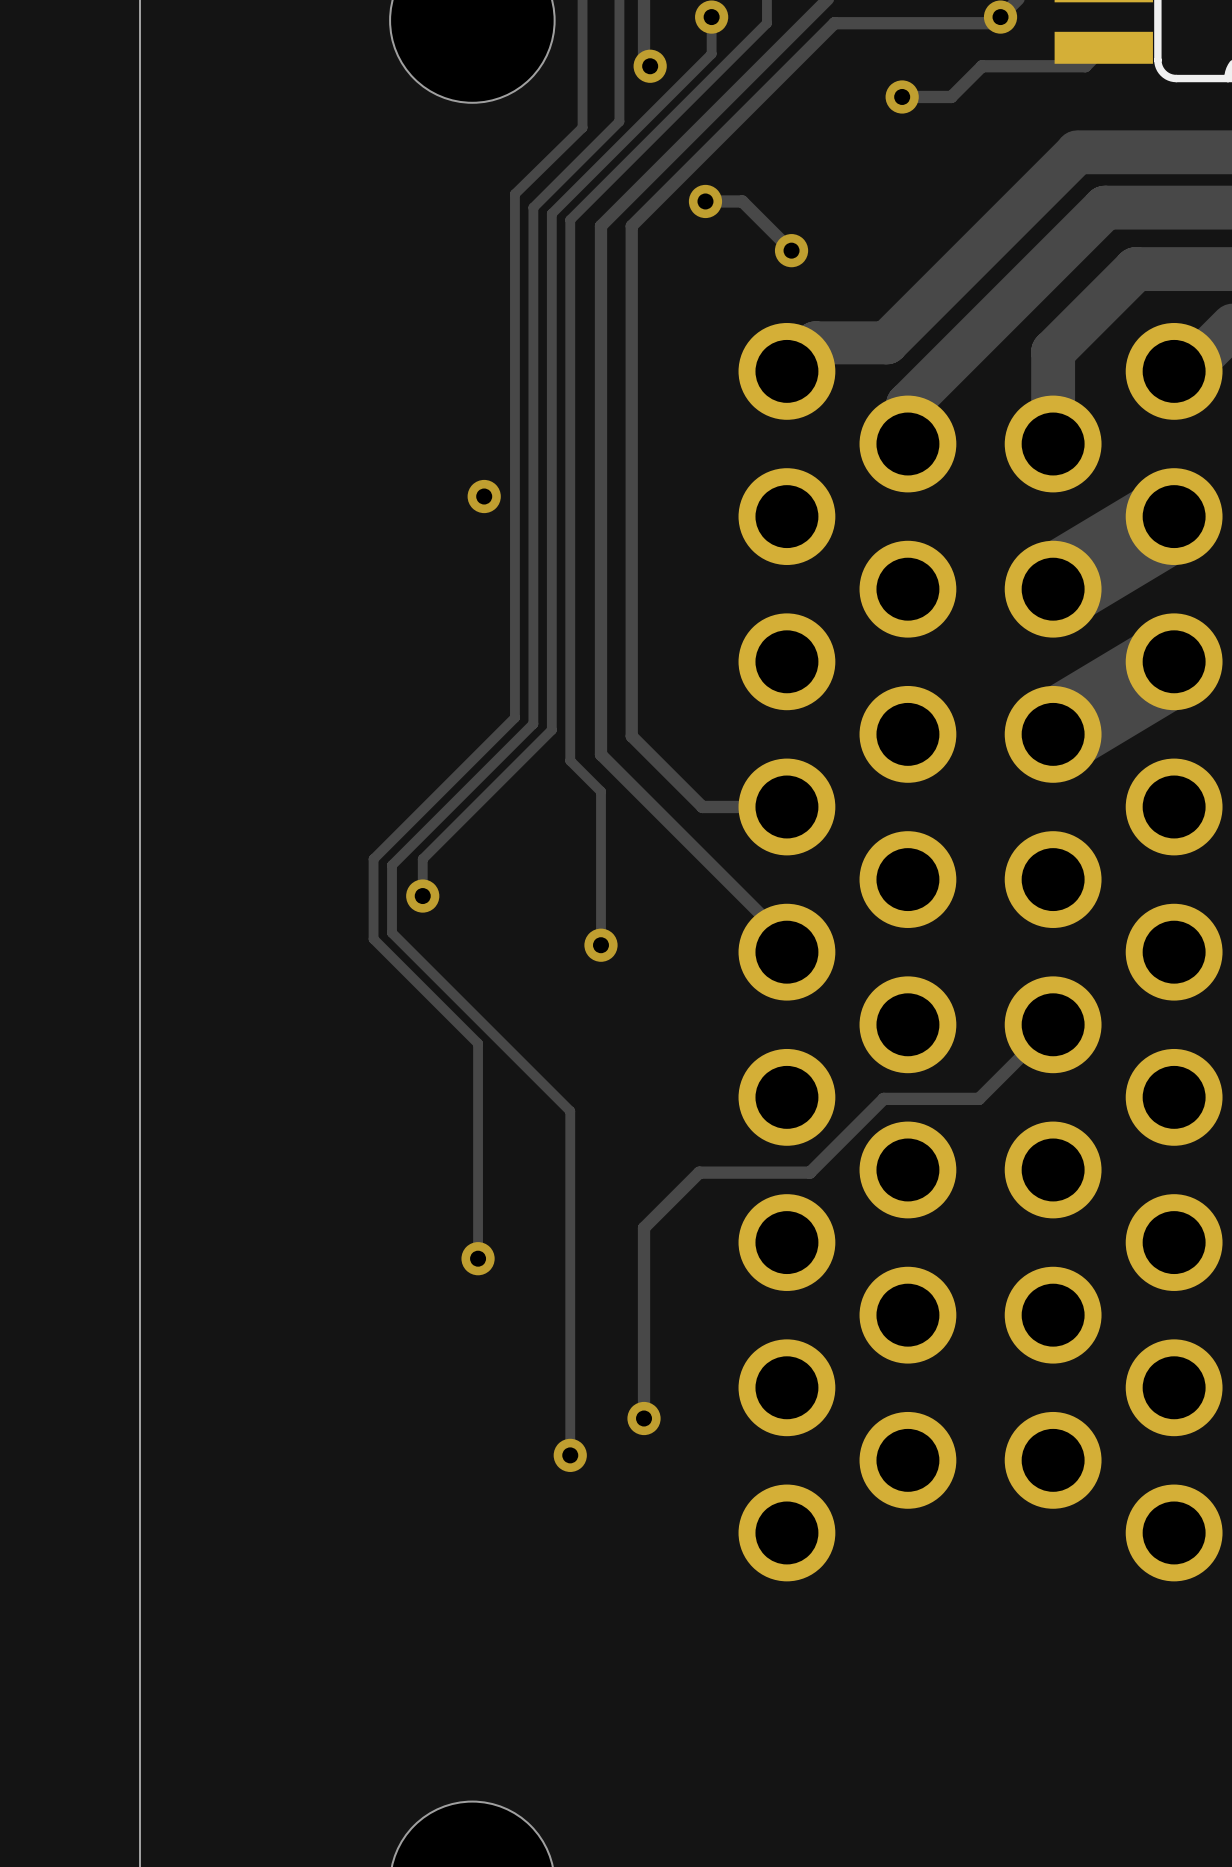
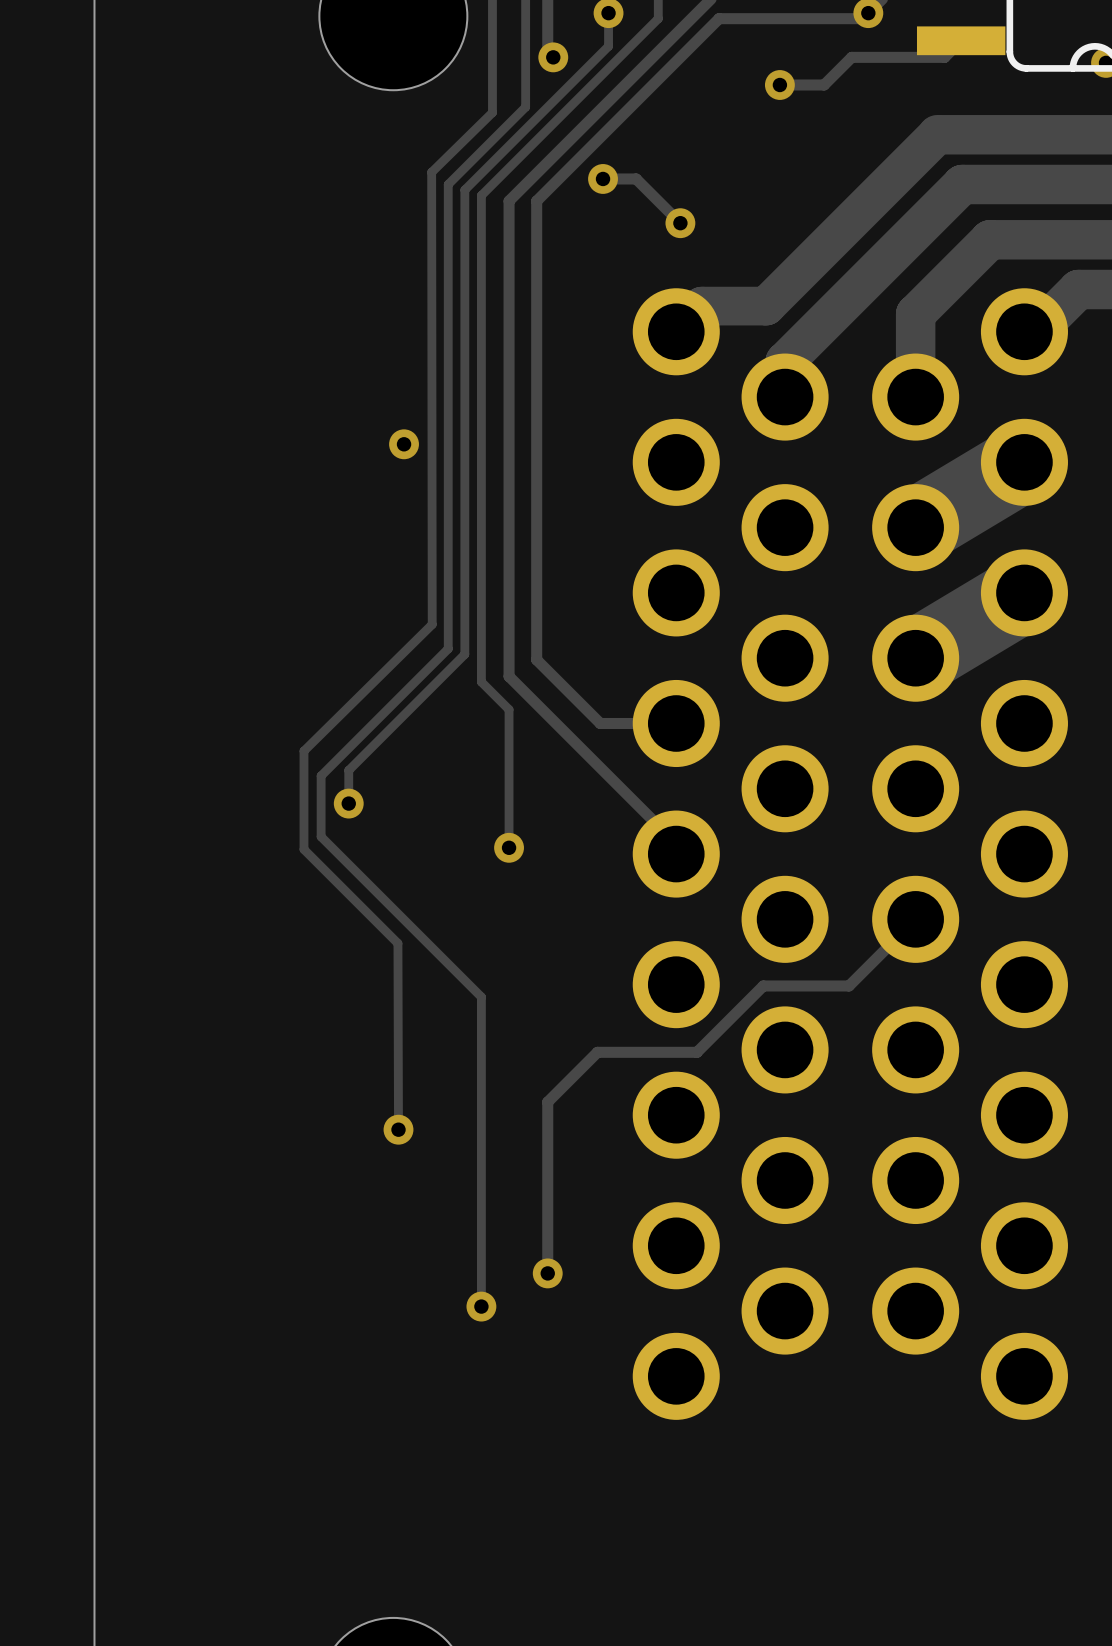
track: (514, 194) (514, 717) (373, 859) (373, 939) (478, 1043) (478, 1258) -> (431, 172) (432, 624) (303, 751) (303, 849) (397, 943) (398, 1129)

